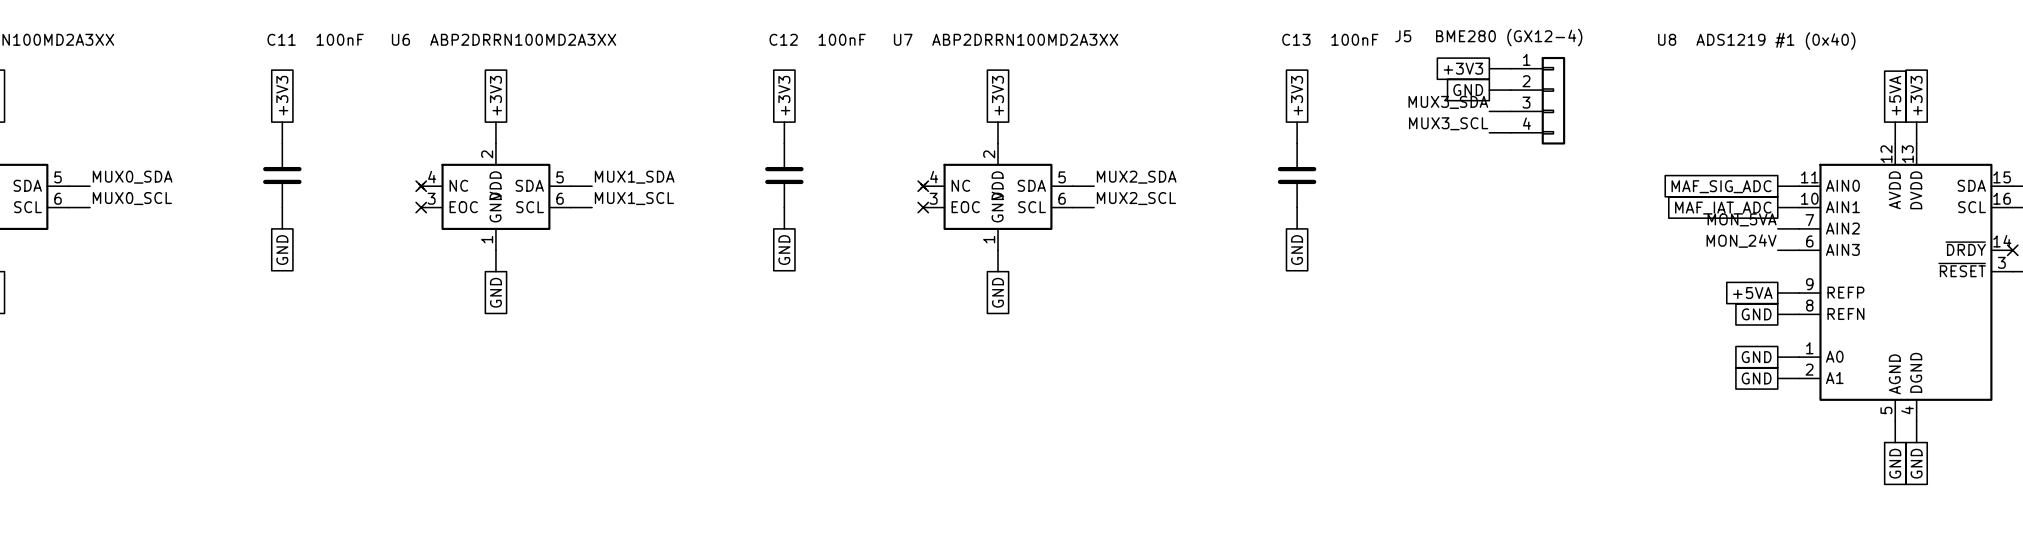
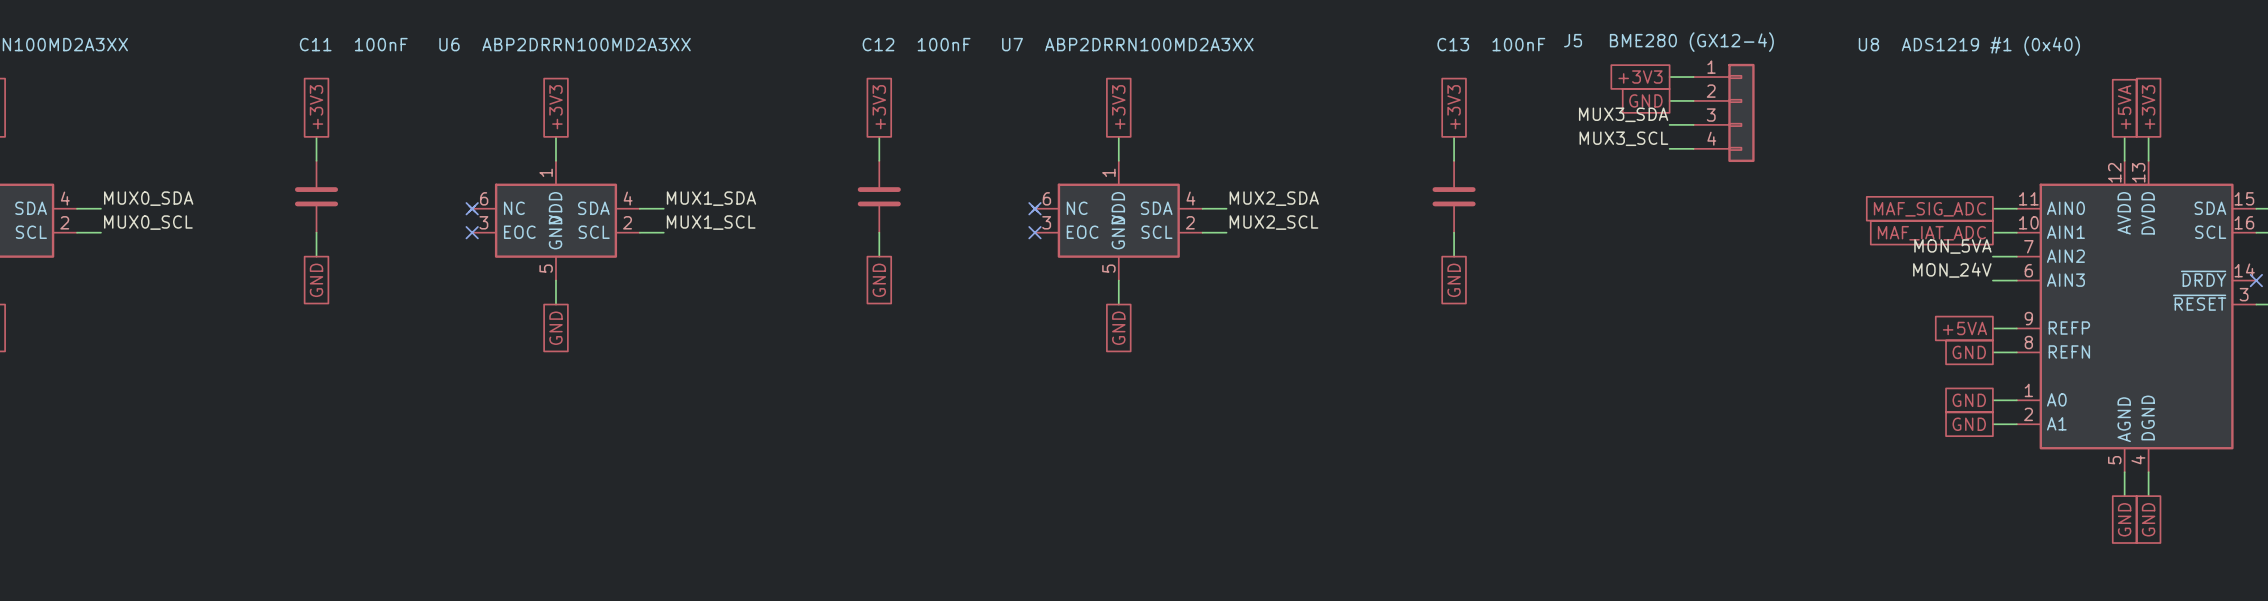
U6 pin number: 2 (487, 154) -> 1 (546, 172)
U7 pin number: 2 (989, 154) -> 1 (1108, 172)
part pin number: 5 (58, 177) -> 4 (65, 198)
U6 pin number: 4 (432, 177) -> 6 (484, 198)
U6 pin number: 5 (560, 177) -> 4 (628, 198)
U7 pin number: 4 (934, 177) -> 6 (1046, 198)
U7 pin number: 5 (1062, 177) -> 4 (1190, 198)
part pin number: 6 (58, 198) -> 2 (64, 222)
U6 pin number: 6 (560, 198) -> 2 (627, 222)
U7 pin number: 6 (1062, 198) -> 2 (1190, 222)
U6 pin number: 1 (487, 239) -> 5 (546, 268)
U7 pin number: 1 (989, 239) -> 5 (1108, 268)

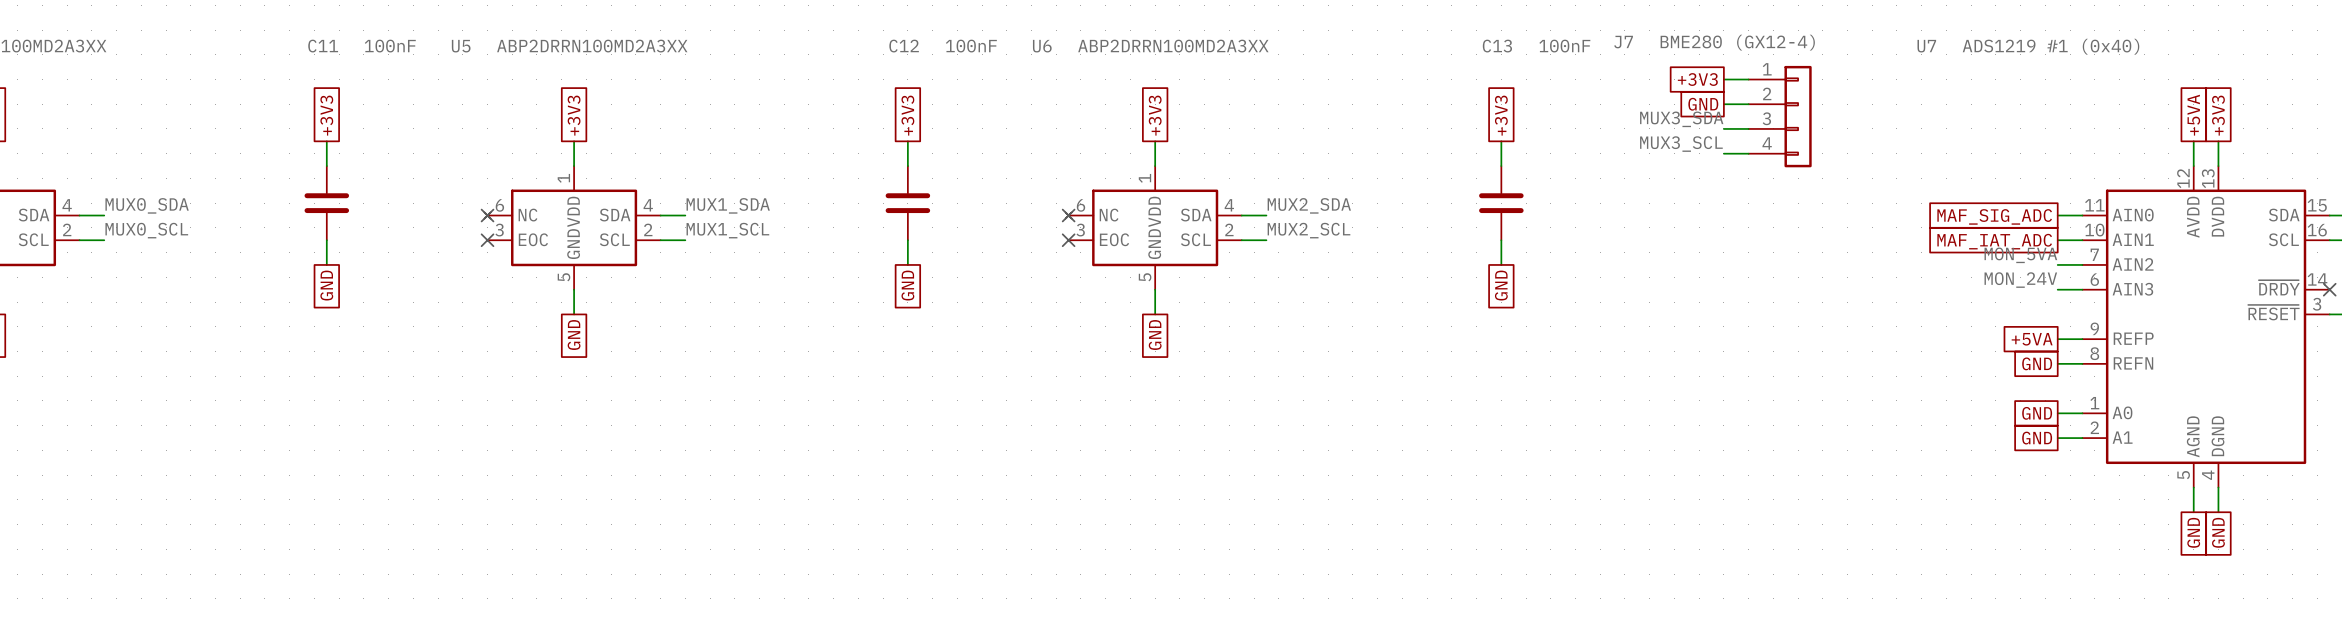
J5 name: J5 (1573, 40) -> J7 (1623, 42)
U6 name: U6 (449, 44) -> U5 (461, 46)
U7 name: U7 (1012, 44) -> U6 (1042, 46)
U8 name: U8 (1868, 44) -> U7 (1926, 46)

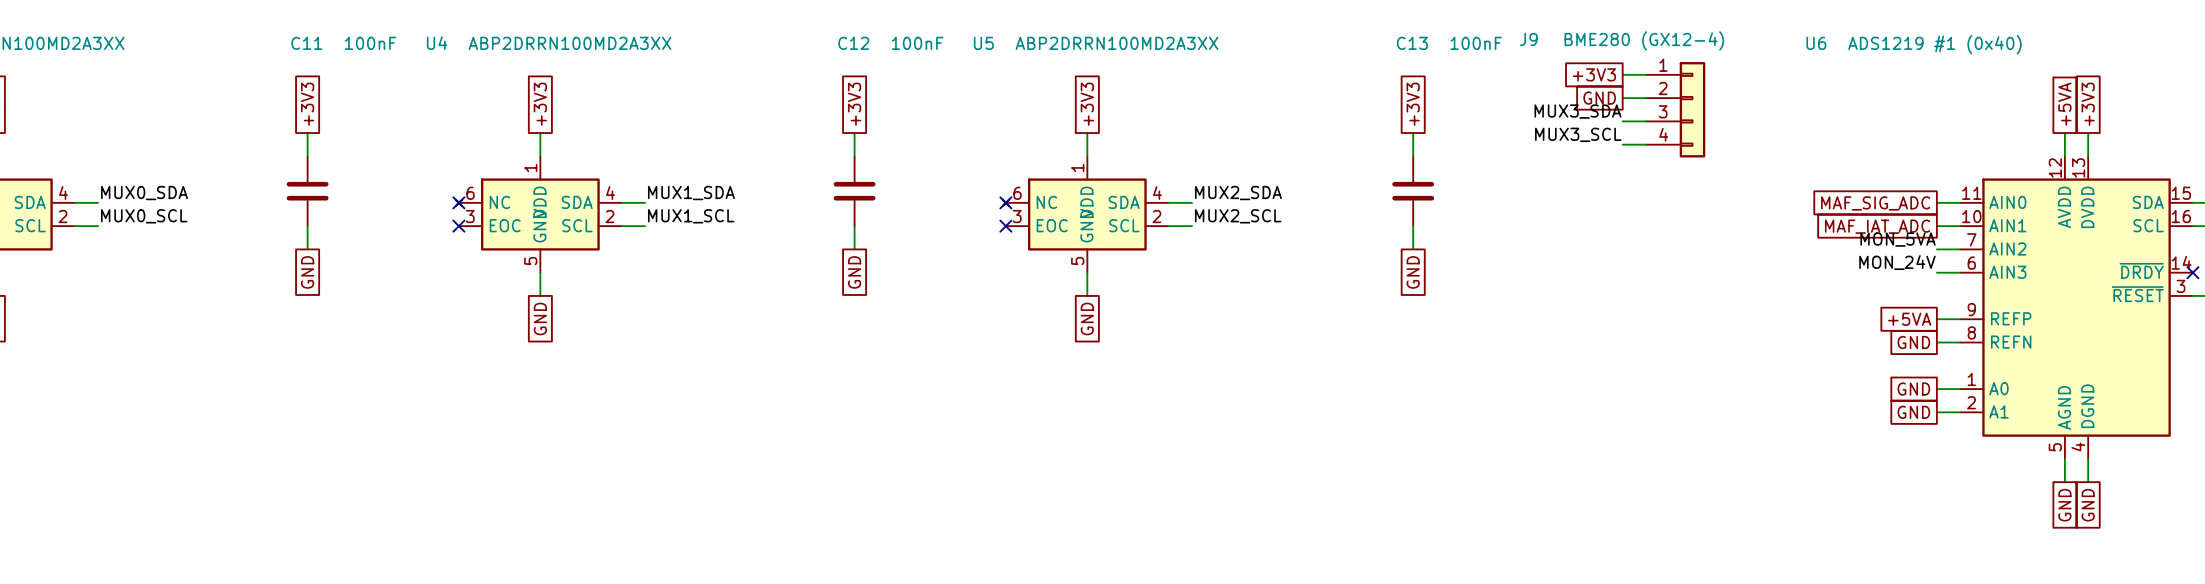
J7 name: J7 (1623, 42) -> J9 (1528, 39)
U5 name: U5 (461, 46) -> U4 (437, 43)
U6 name: U6 (1042, 46) -> U5 (983, 43)
U7 name: U7 (1926, 46) -> U6 (1816, 43)

